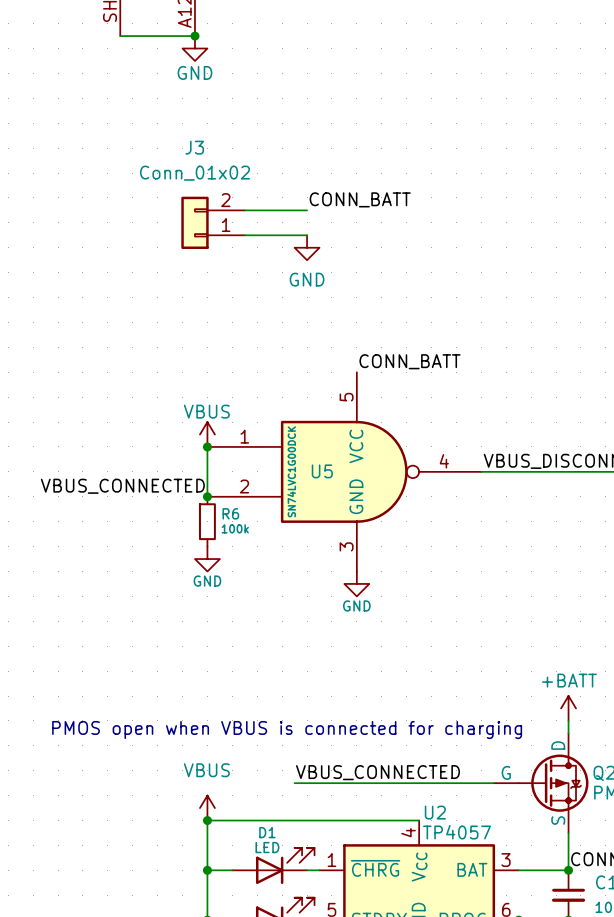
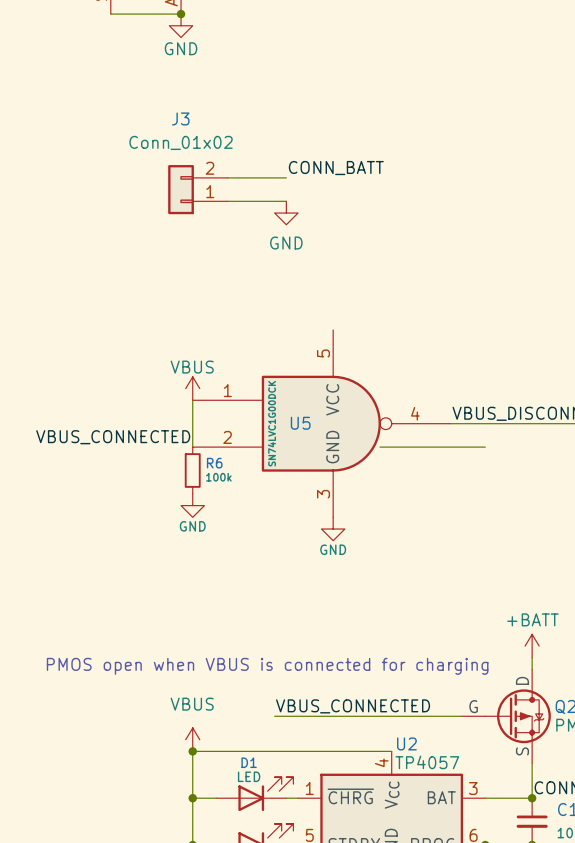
label: CONN_BATT (410, 361) -> none
junction: (207, 446) -> none
junction: (207, 496) -> none
wire: none -> (379, 447) (485, 447)

